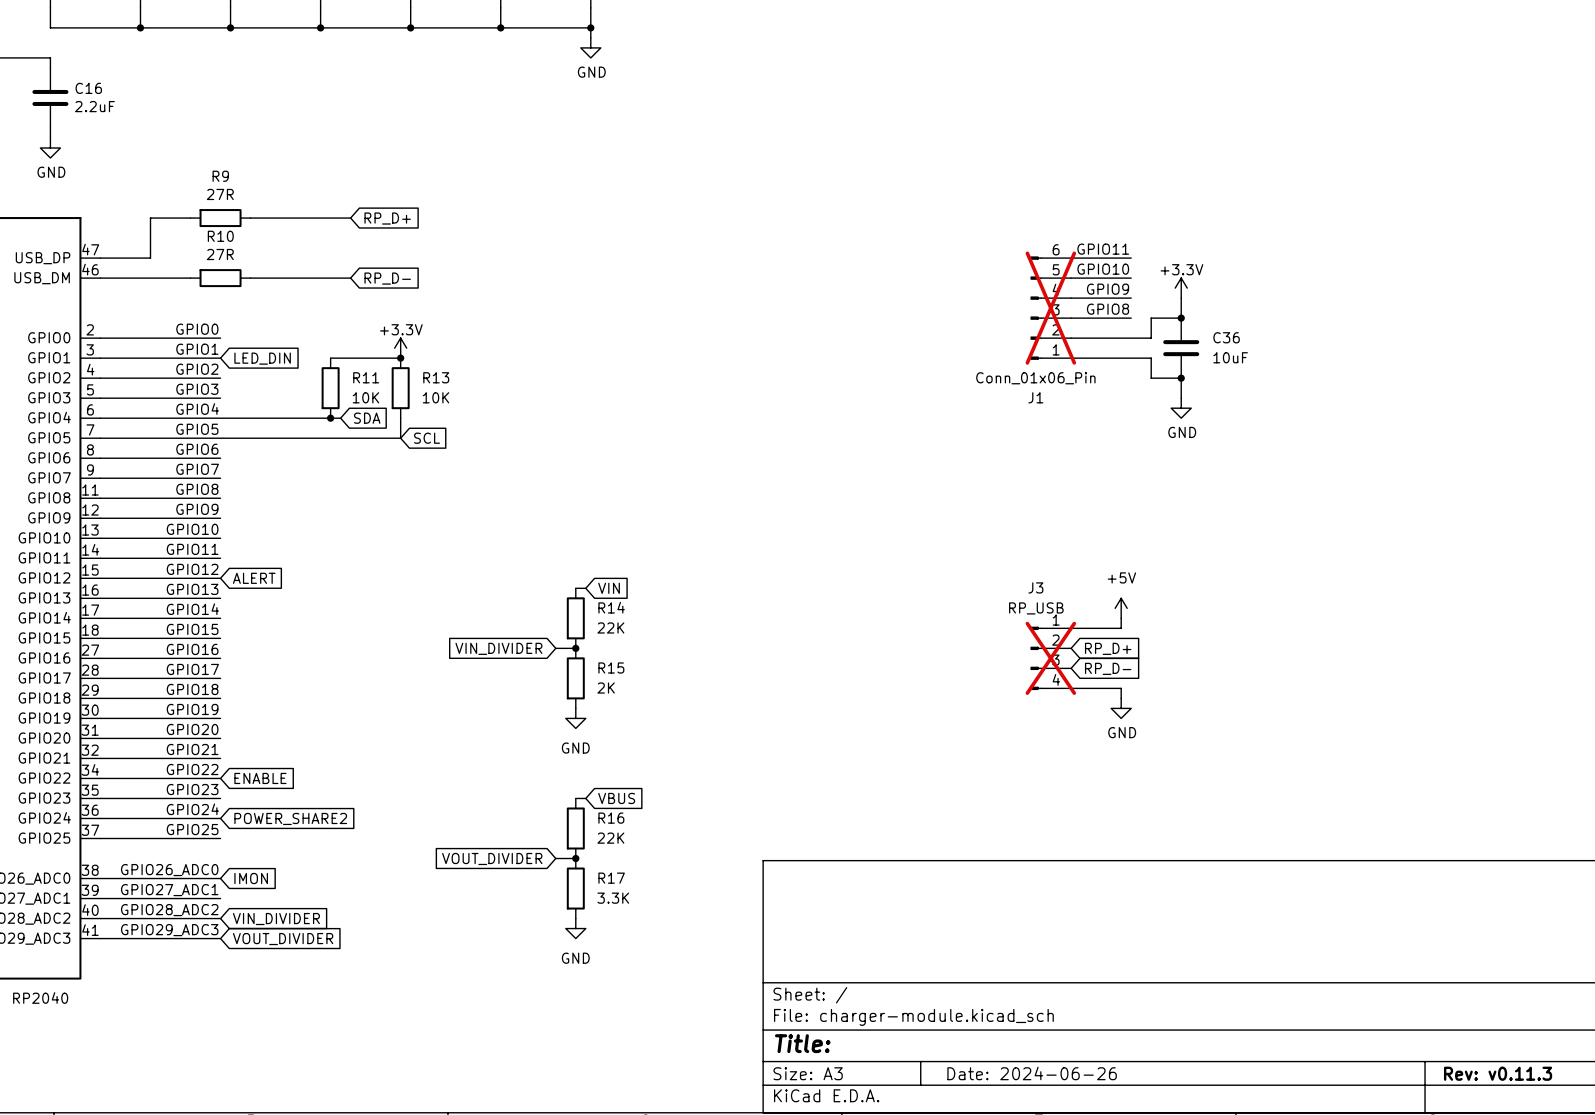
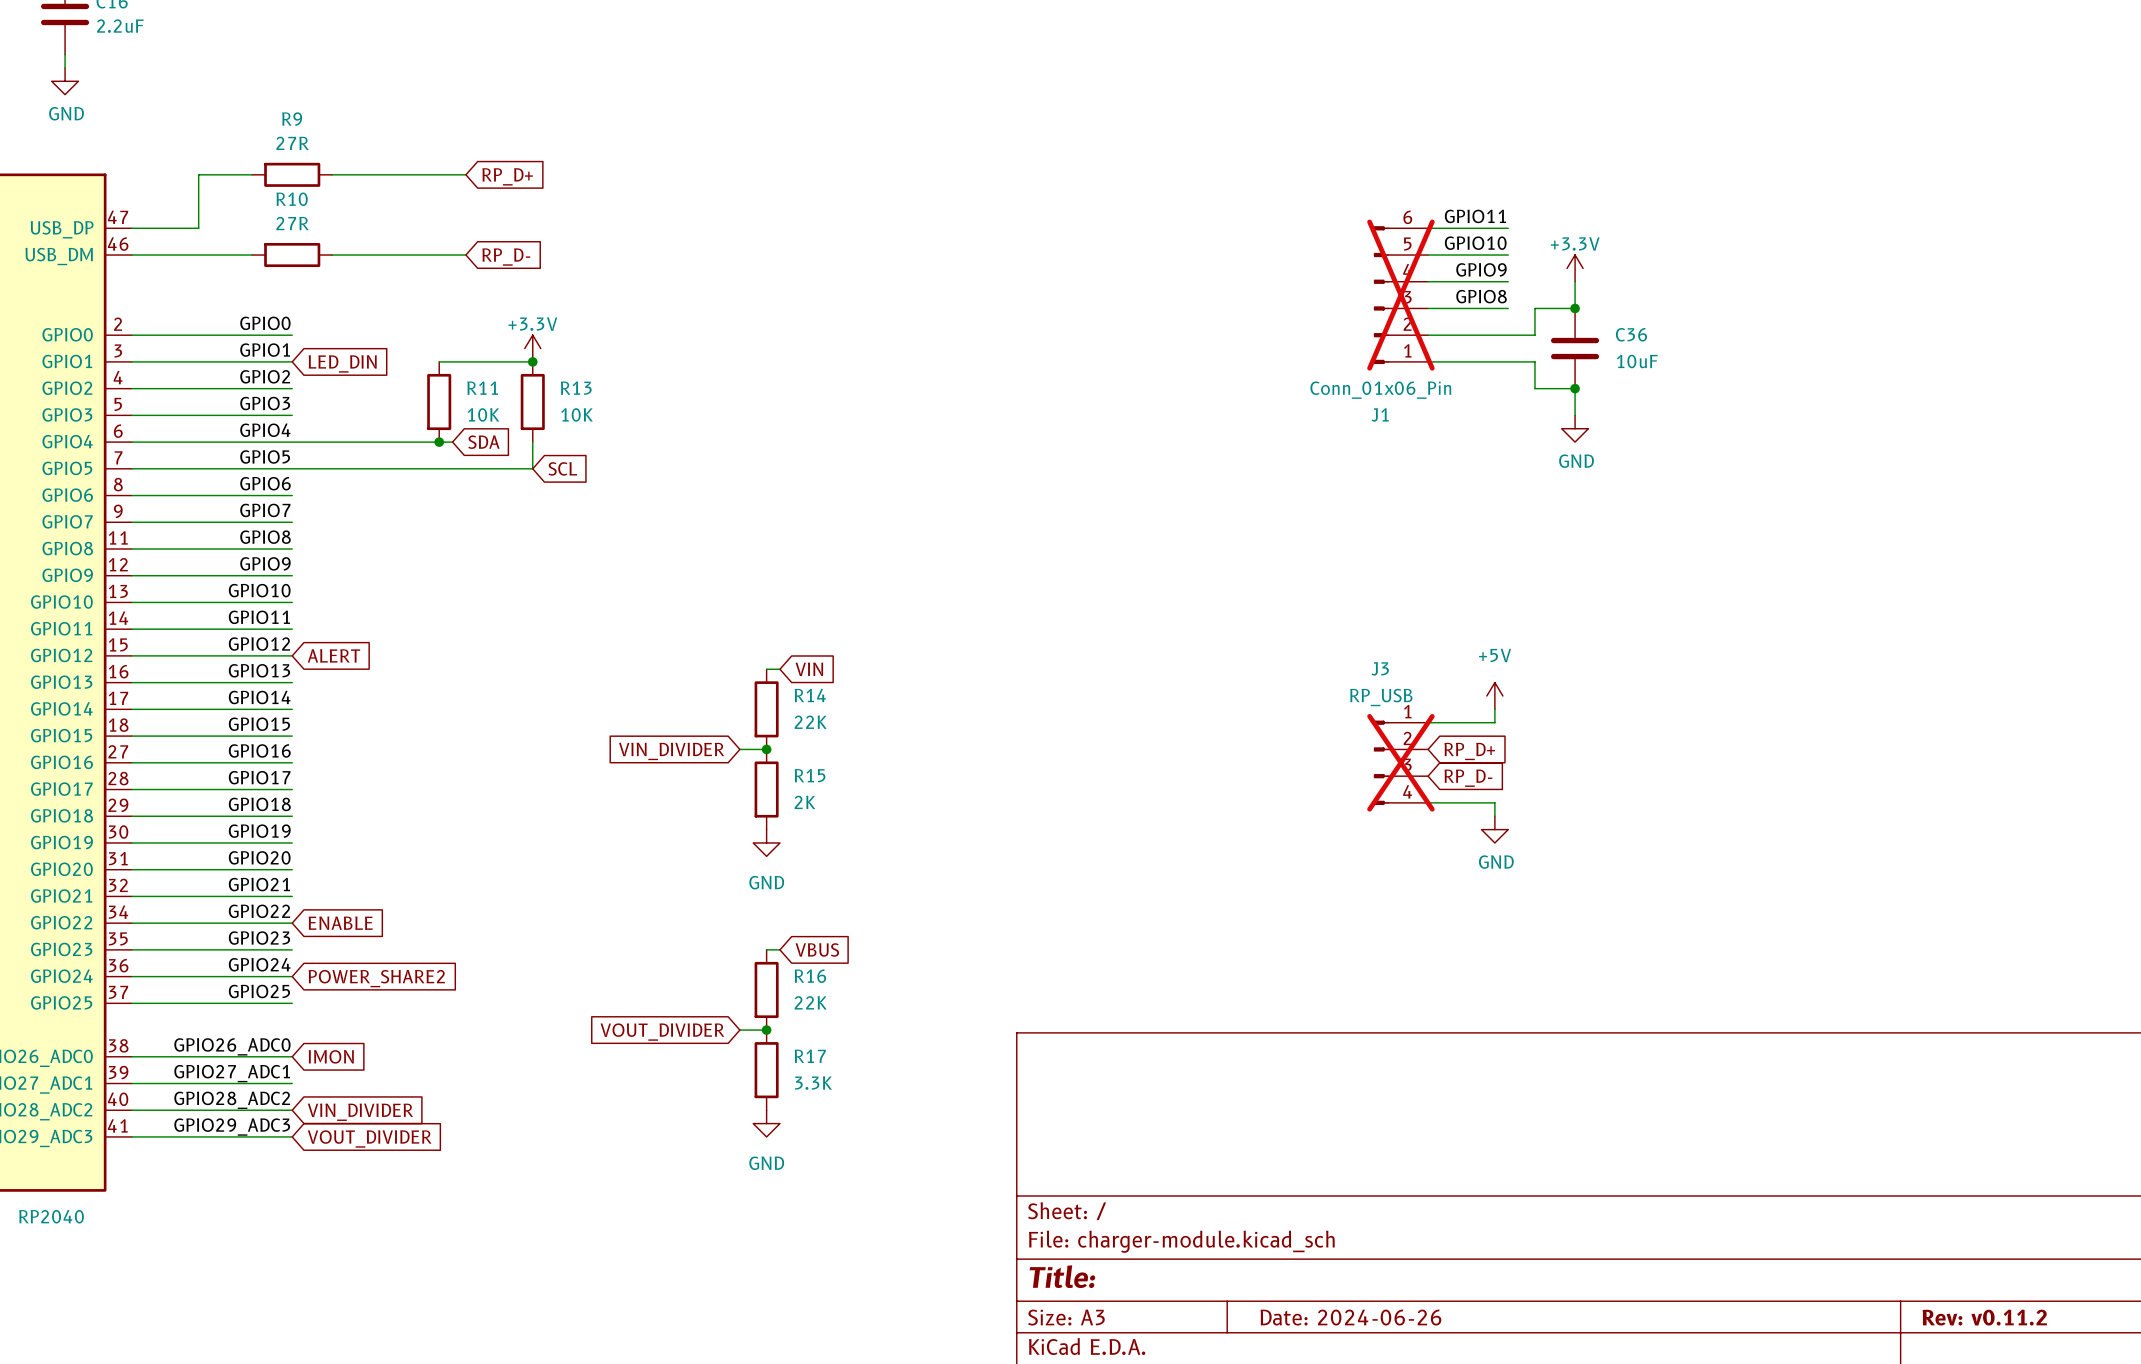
title block: Rev: v0.11.3 (1498, 1073) -> Rev: v0.11.2 (1984, 1317)

